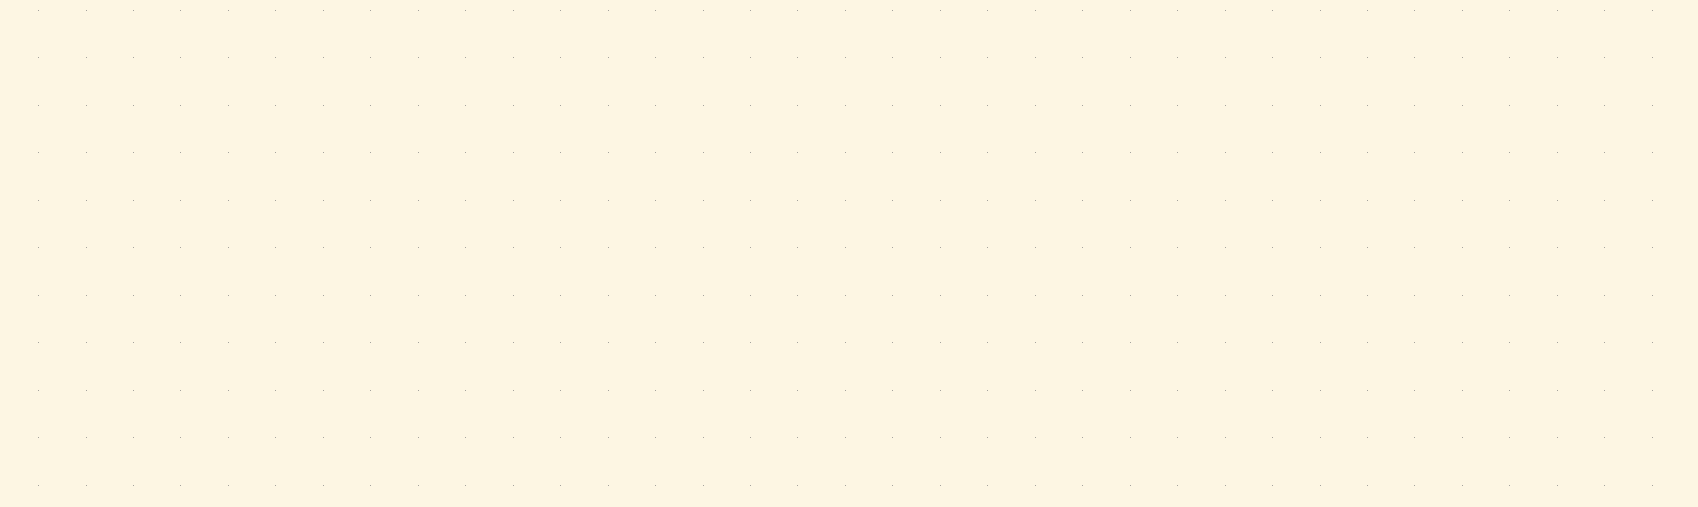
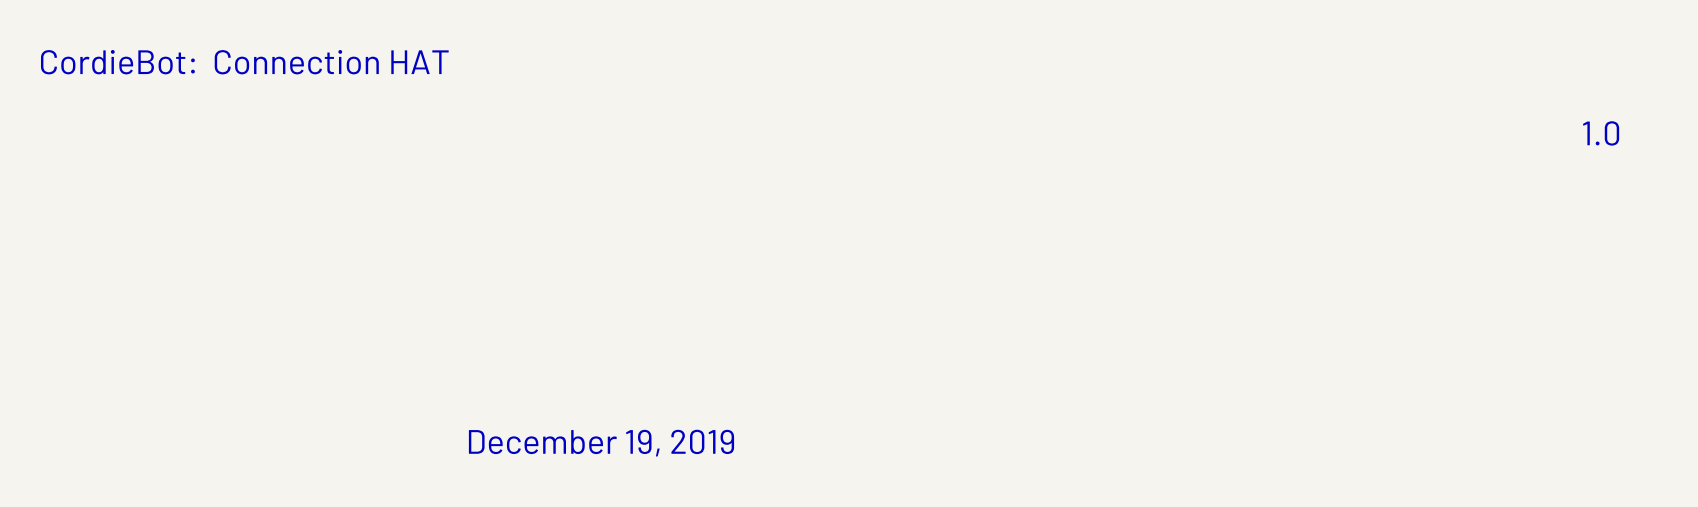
text: none -> CordieBot: Connection HAT (244, 62)
text: none -> 1.0 (1601, 133)
text: none -> December 19, 2019 (601, 443)

